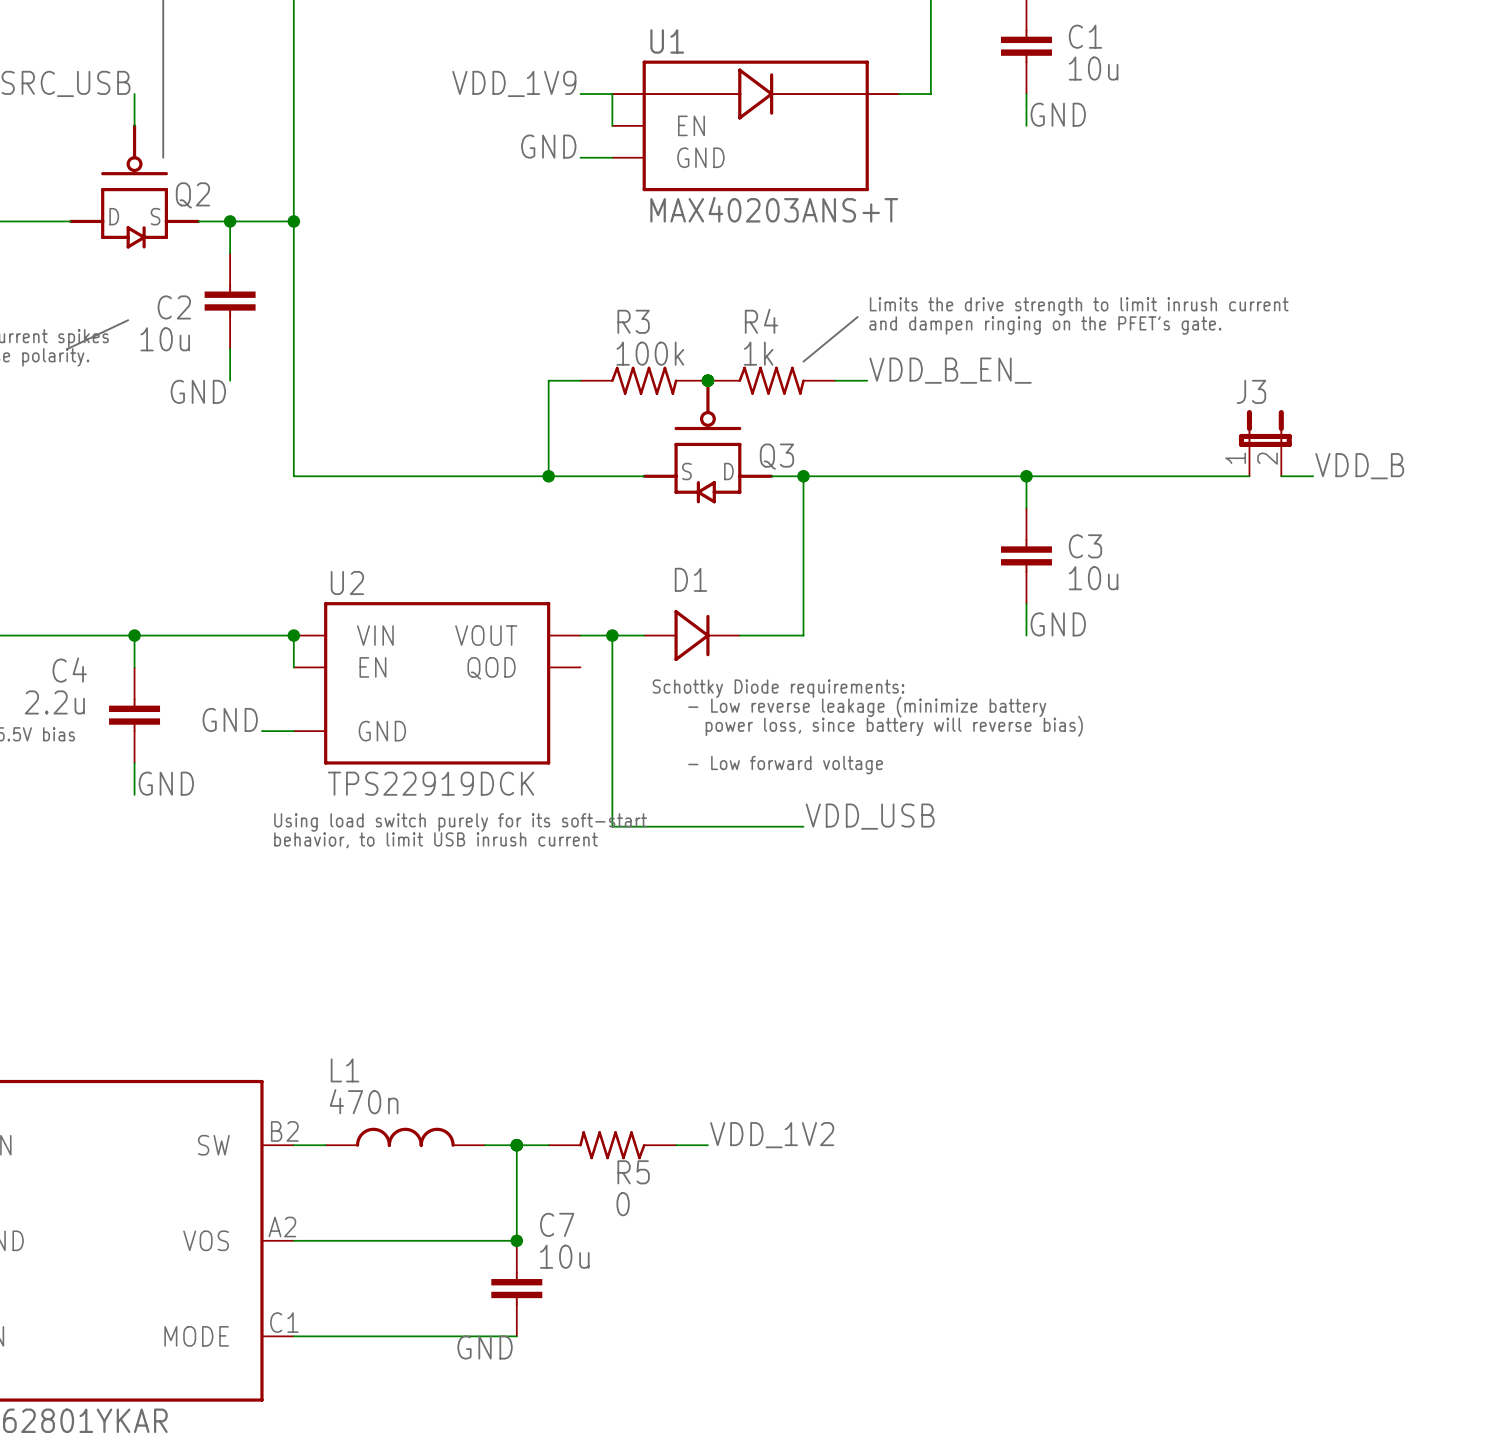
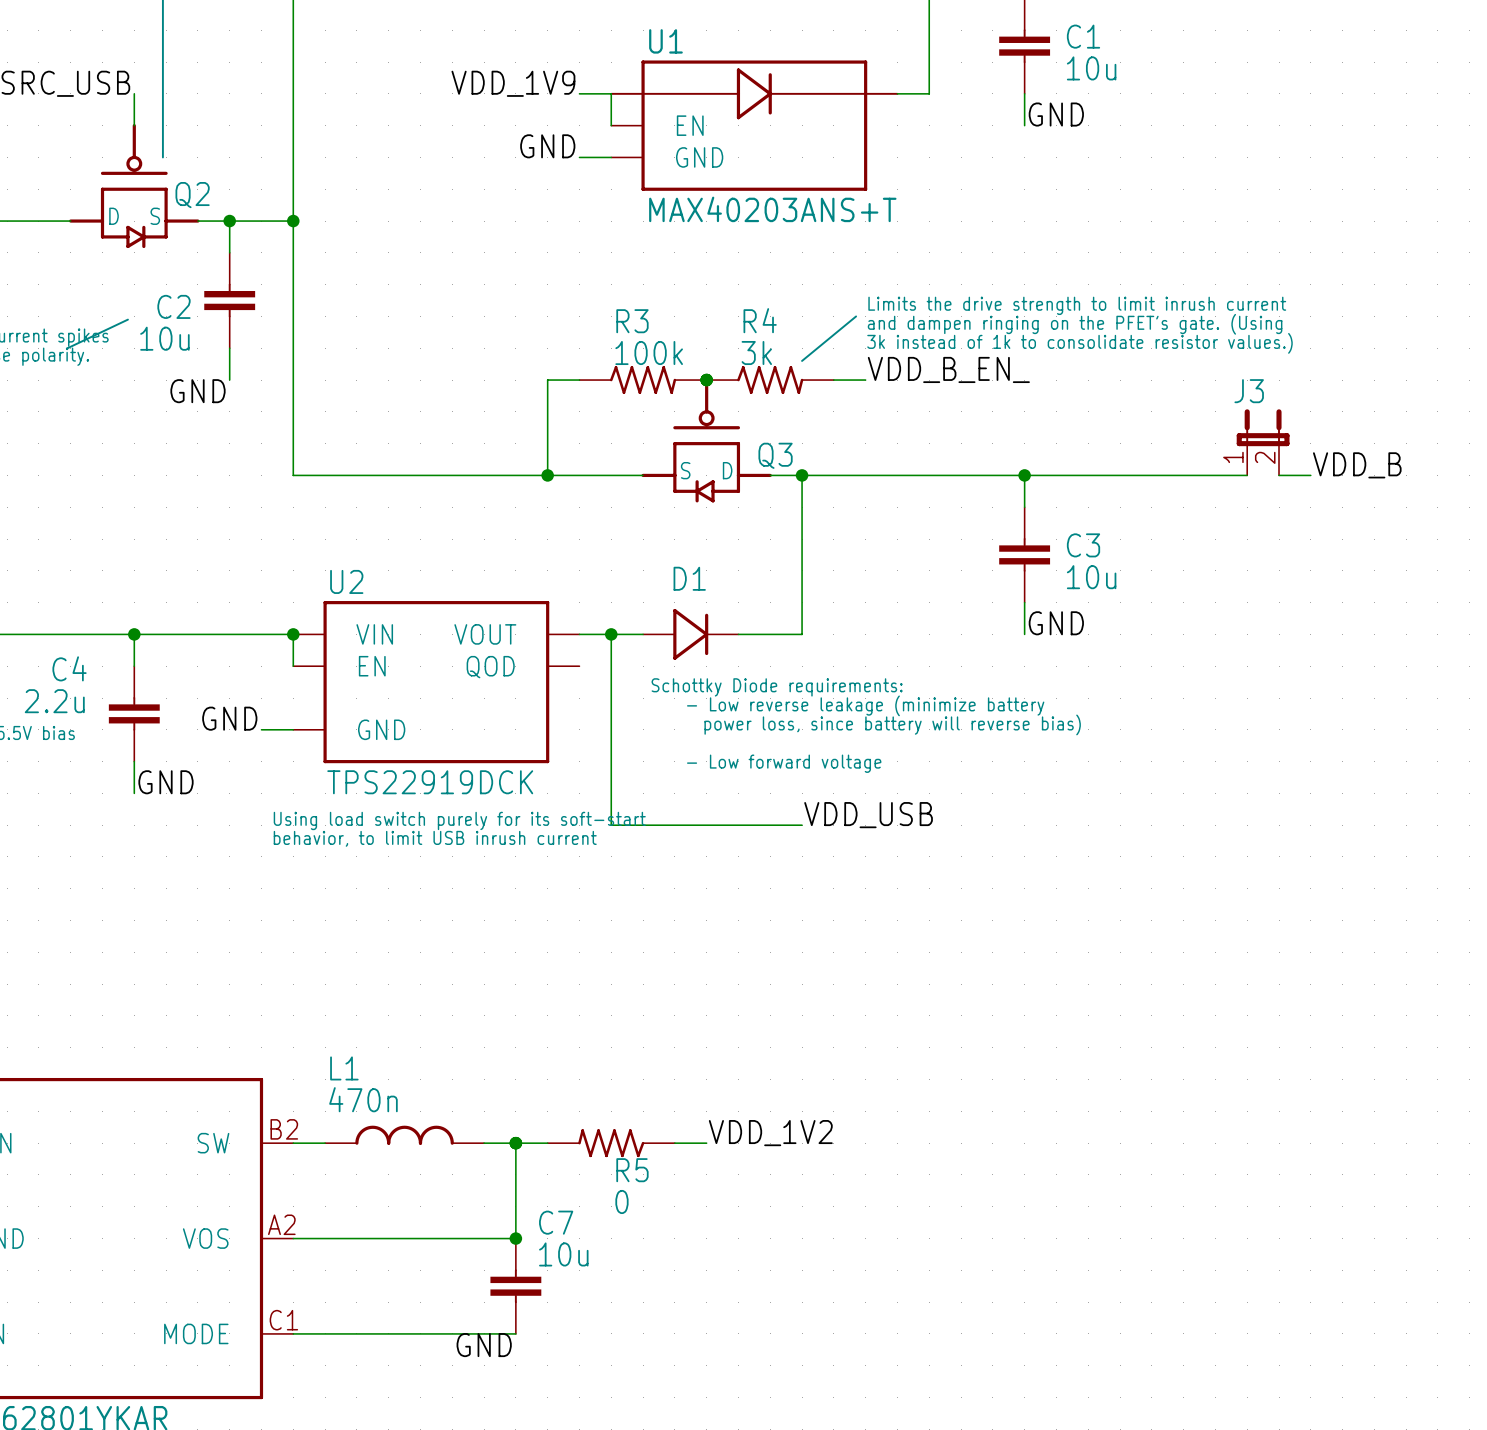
text: and dampen ringing on the PFET's gate. (1045, 325) -> and dampen ringing on the PFET's gate. (Using (1075, 324)
text: none -> 3k instead of 1k to consolidate resistor values.) (1079, 343)
R4 value: 1k (758, 353) -> 3k (756, 353)

